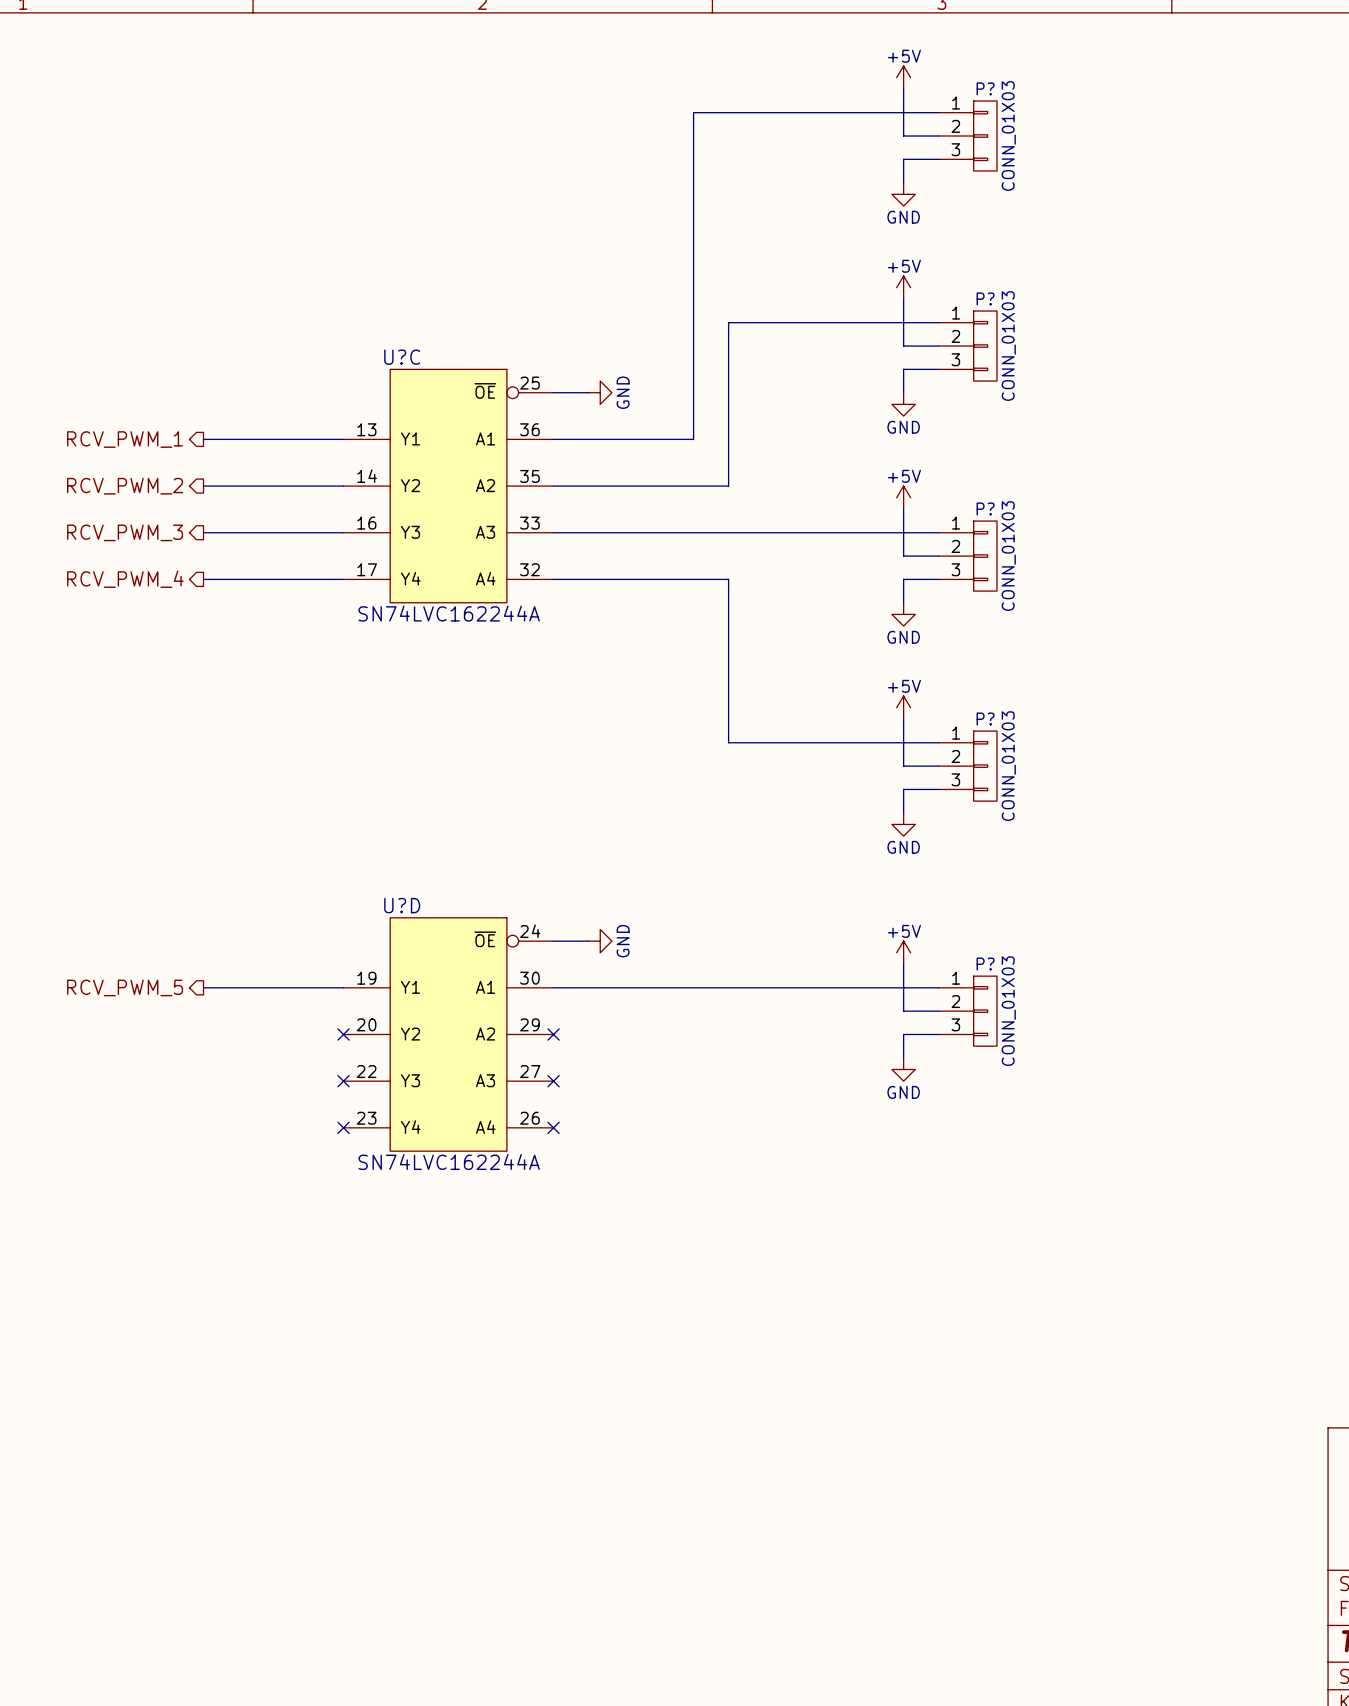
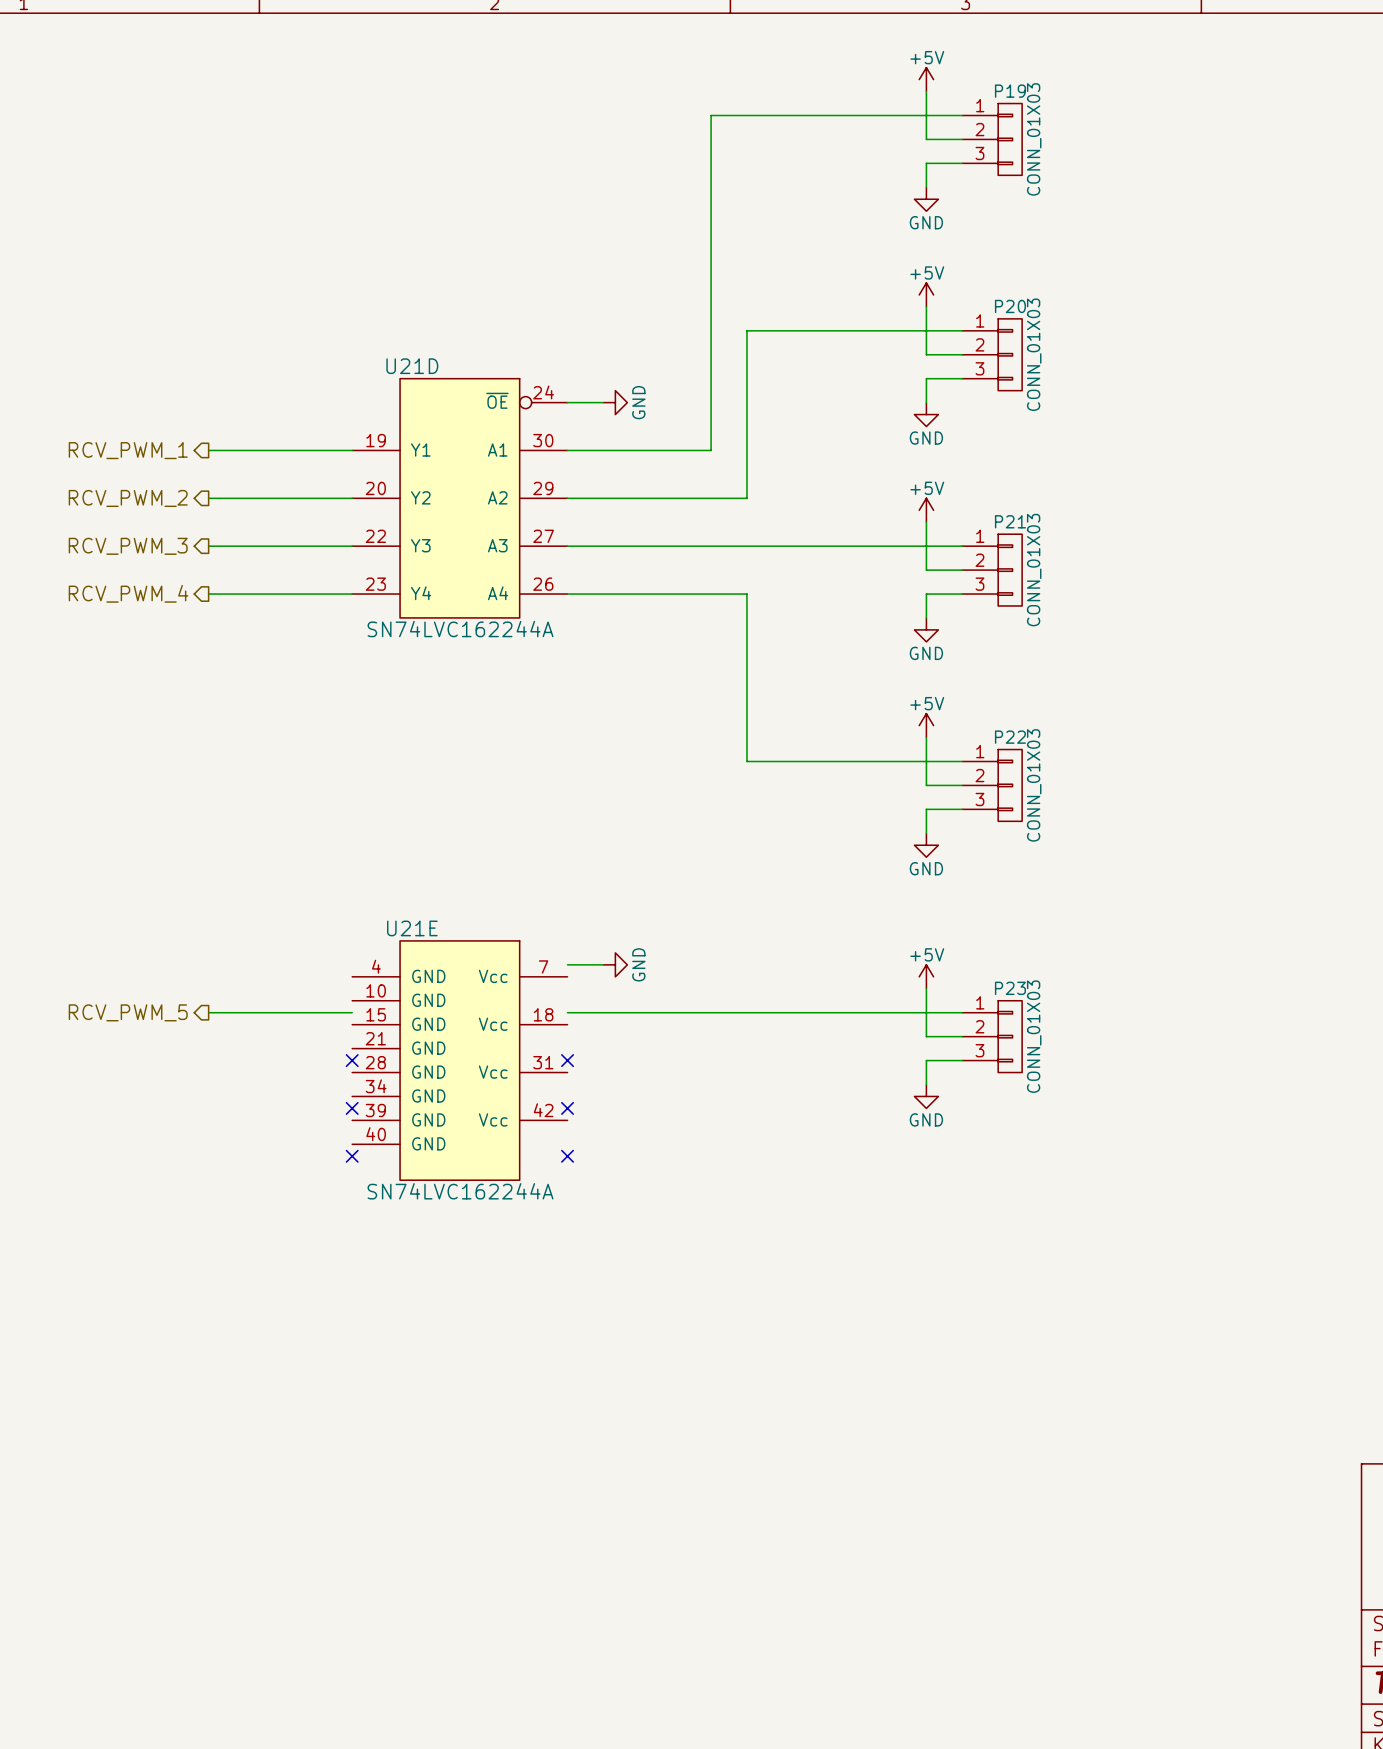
P? name: P? (985, 88) -> P19 (1010, 91)
P? name: P? (985, 298) -> P20 (1010, 306)
U?C name: U?C (402, 357) -> U21D (412, 366)
U?C symbol: [343, 369, 554, 603] -> [352, 378, 568, 618]
P? name: P? (985, 508) -> P21 (1010, 521)
P? name: P? (985, 719) -> P22 (1010, 737)
P? name: P? (985, 964) -> P23 (1010, 988)
U?D: SN74LVC162244A (448, 1034) -> none
U21E: none -> SN74LVC162244A (459, 1060)

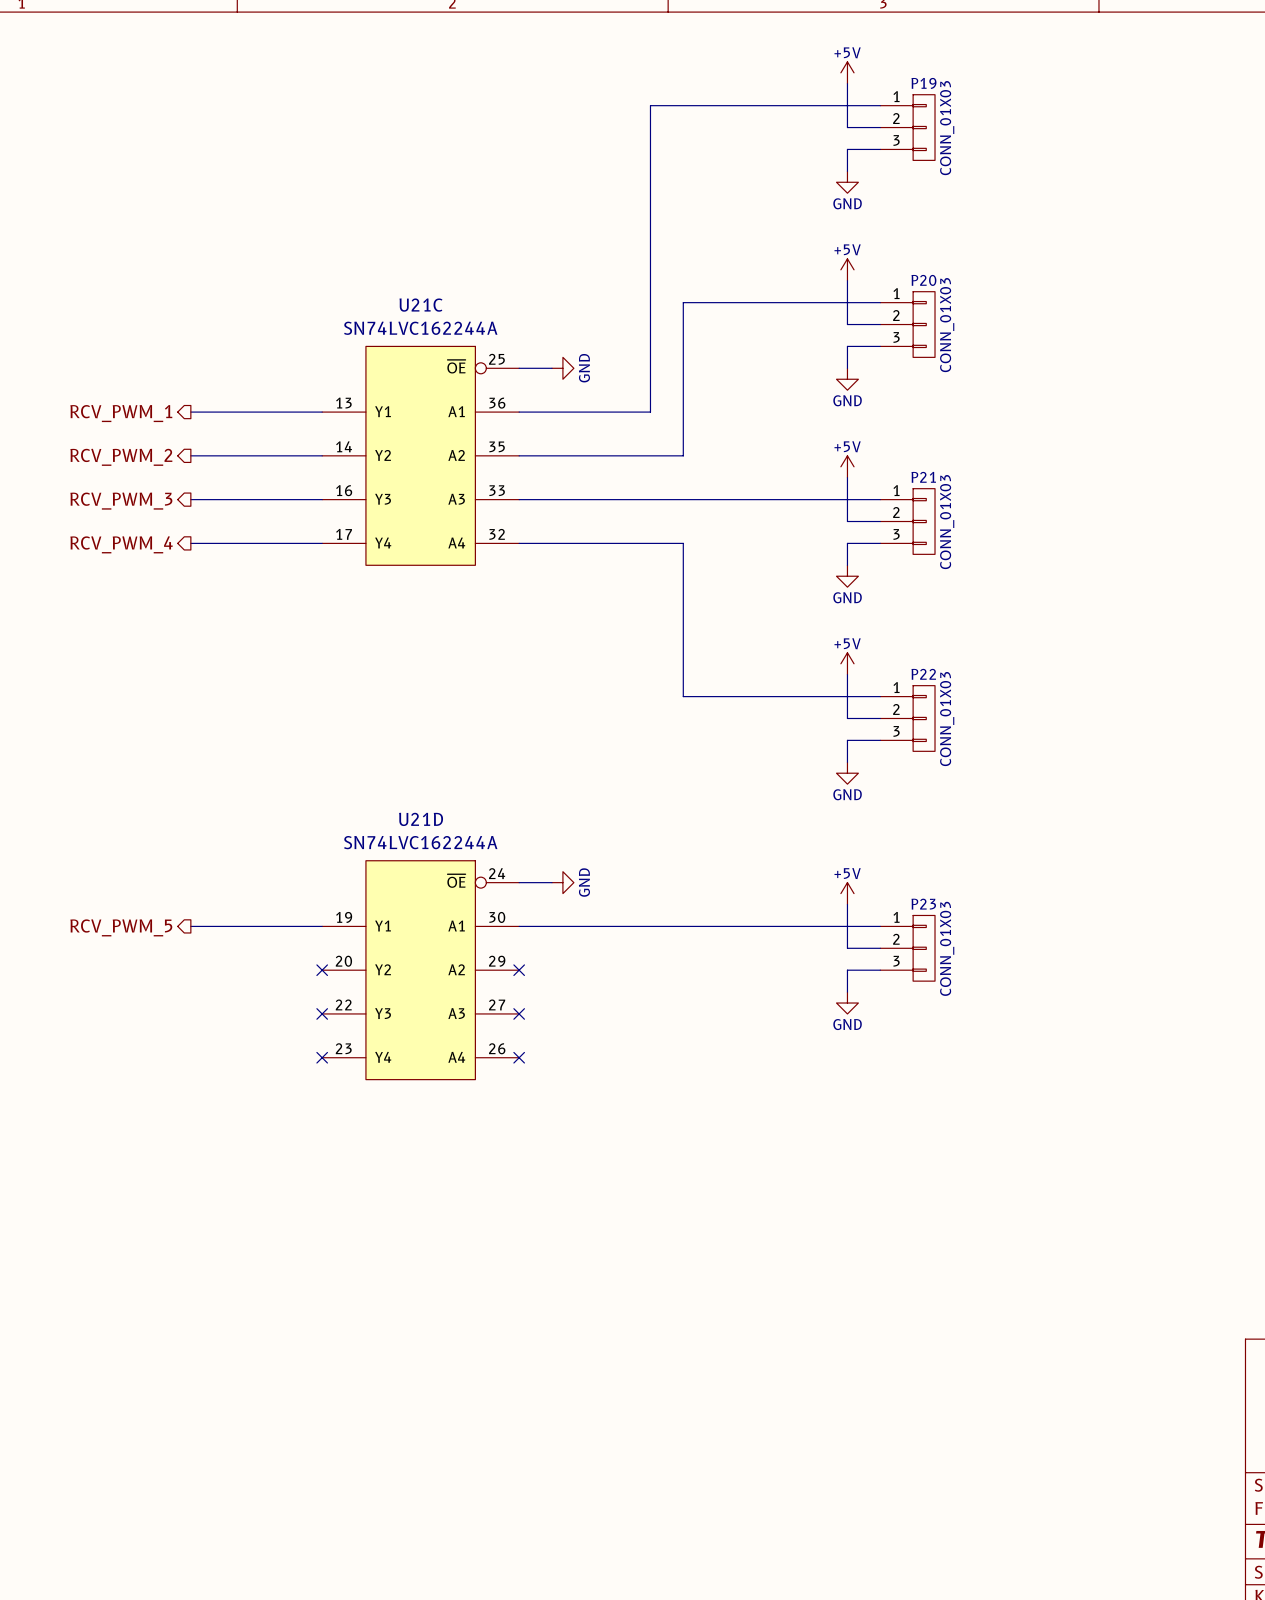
U21D name position: U21D (412, 366) -> U21D (421, 819)
U21D position: (459, 498) -> (420, 970)
U21C: none -> SN74LVC162244A (420, 455)
U21D value position: SN74LVC162244A (460, 629) -> SN74LVC162244A (420, 842)
U21E: SN74LVC162244A (459, 1060) -> none

